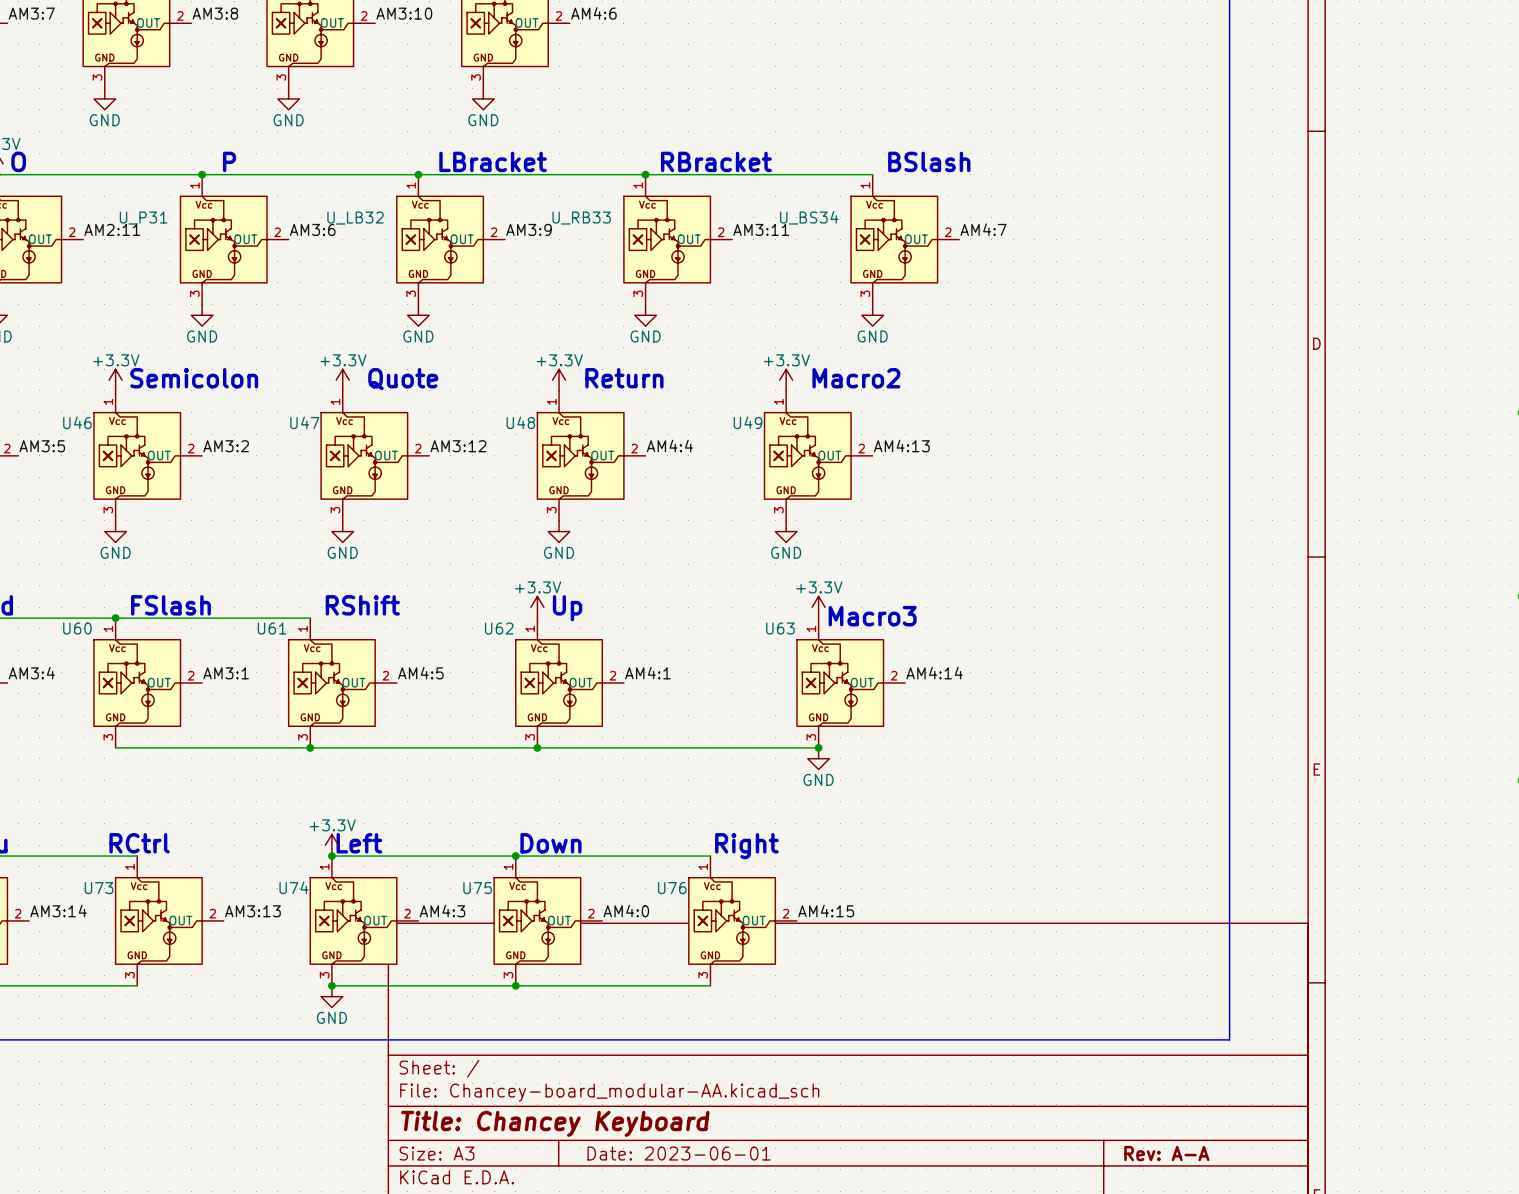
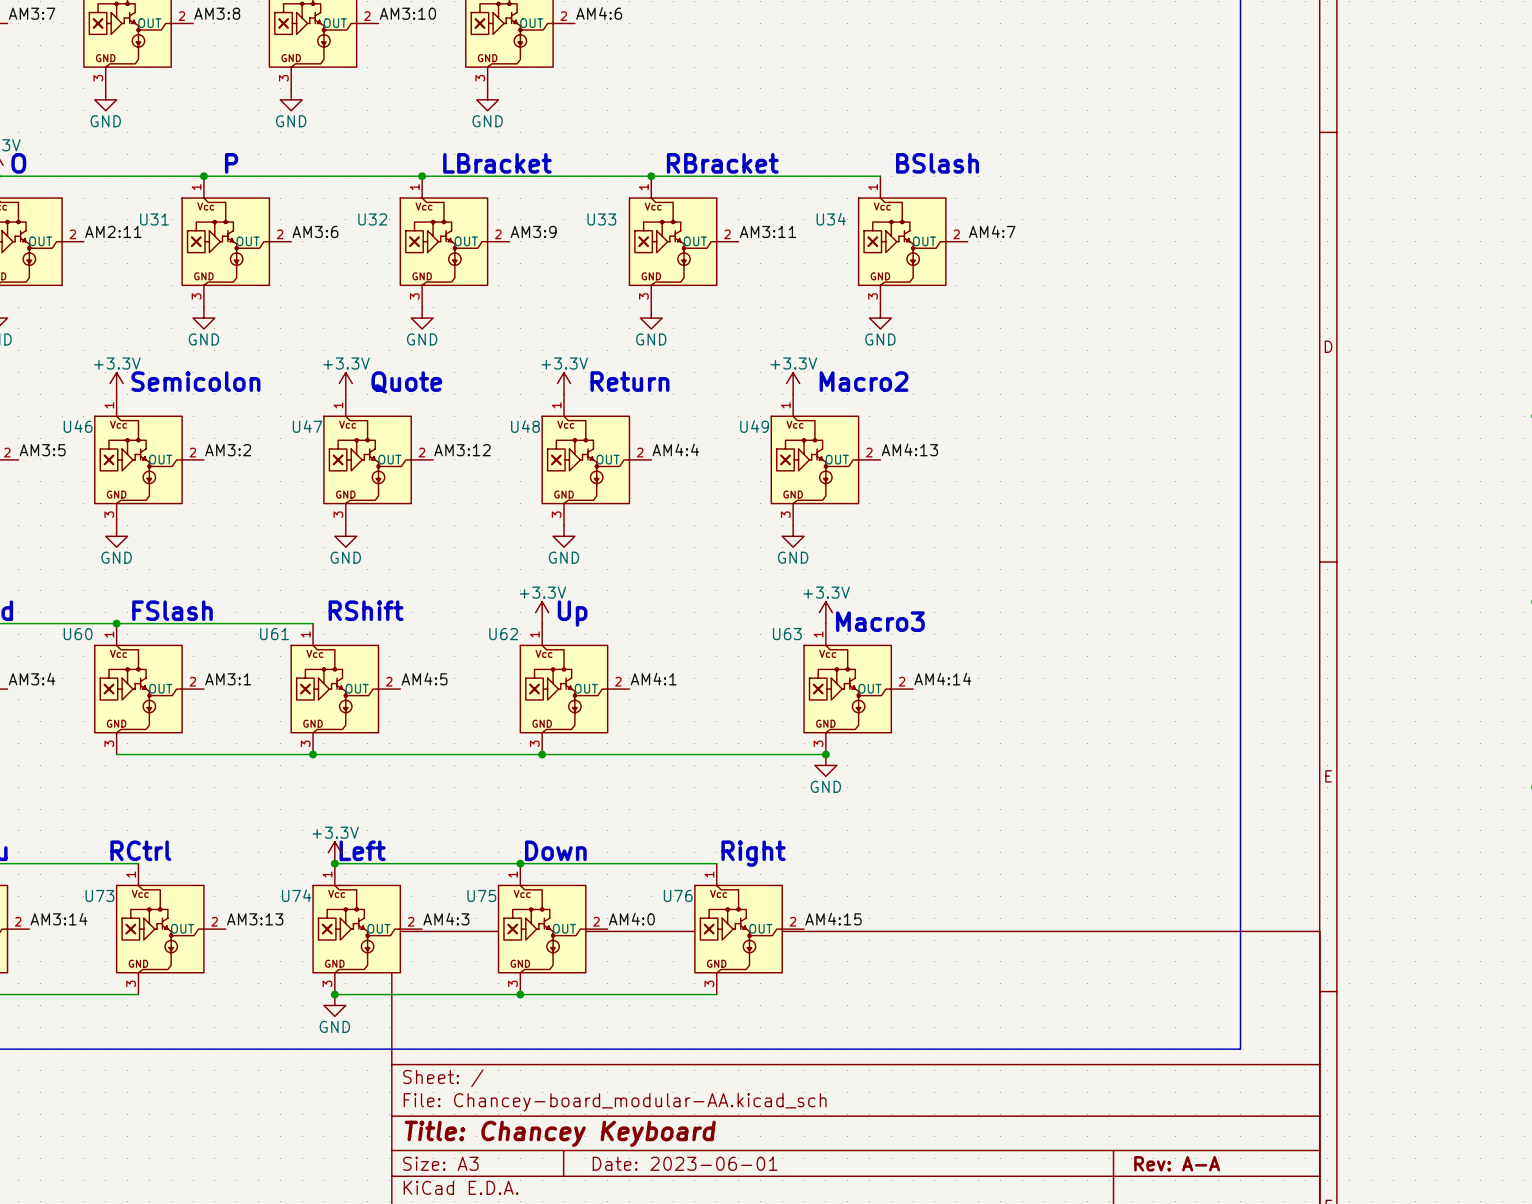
U_BS34 name: U_BS34 (809, 217) -> U34 (831, 219)
U_P31 name: U_P31 (143, 218) -> U31 (154, 219)
U_LB32 name: U_LB32 (355, 218) -> U32 (372, 219)
U_RB33 name: U_RB33 (581, 218) -> U33 (601, 219)

